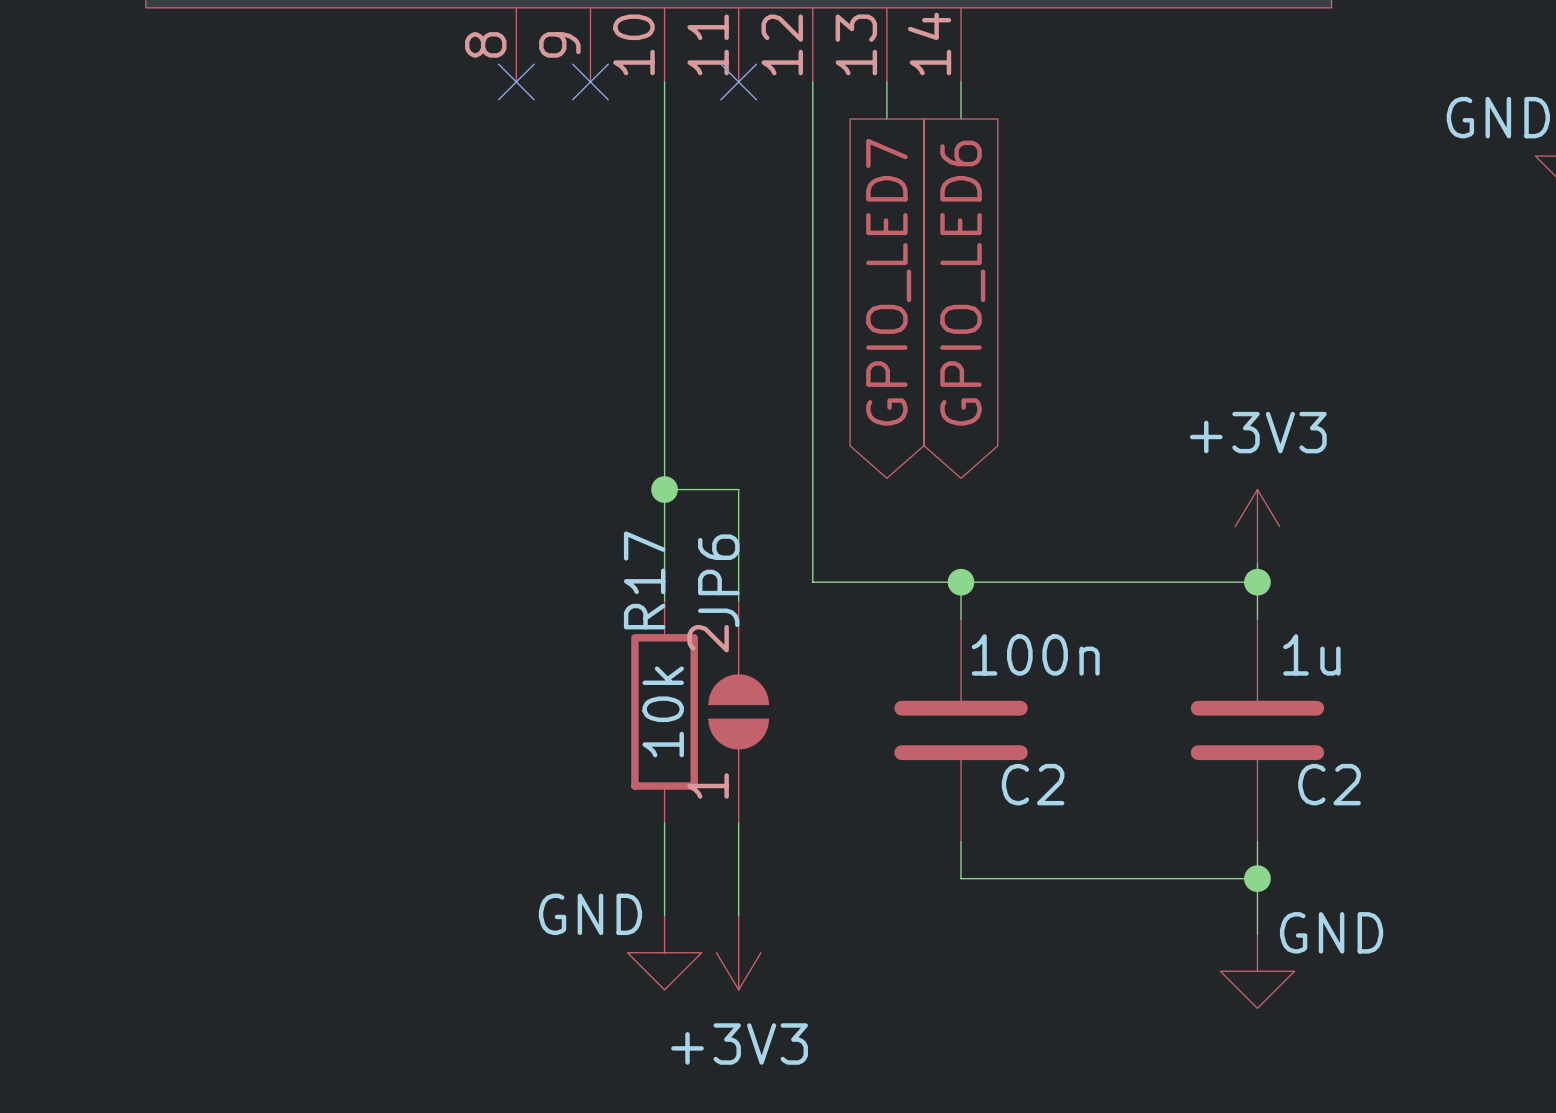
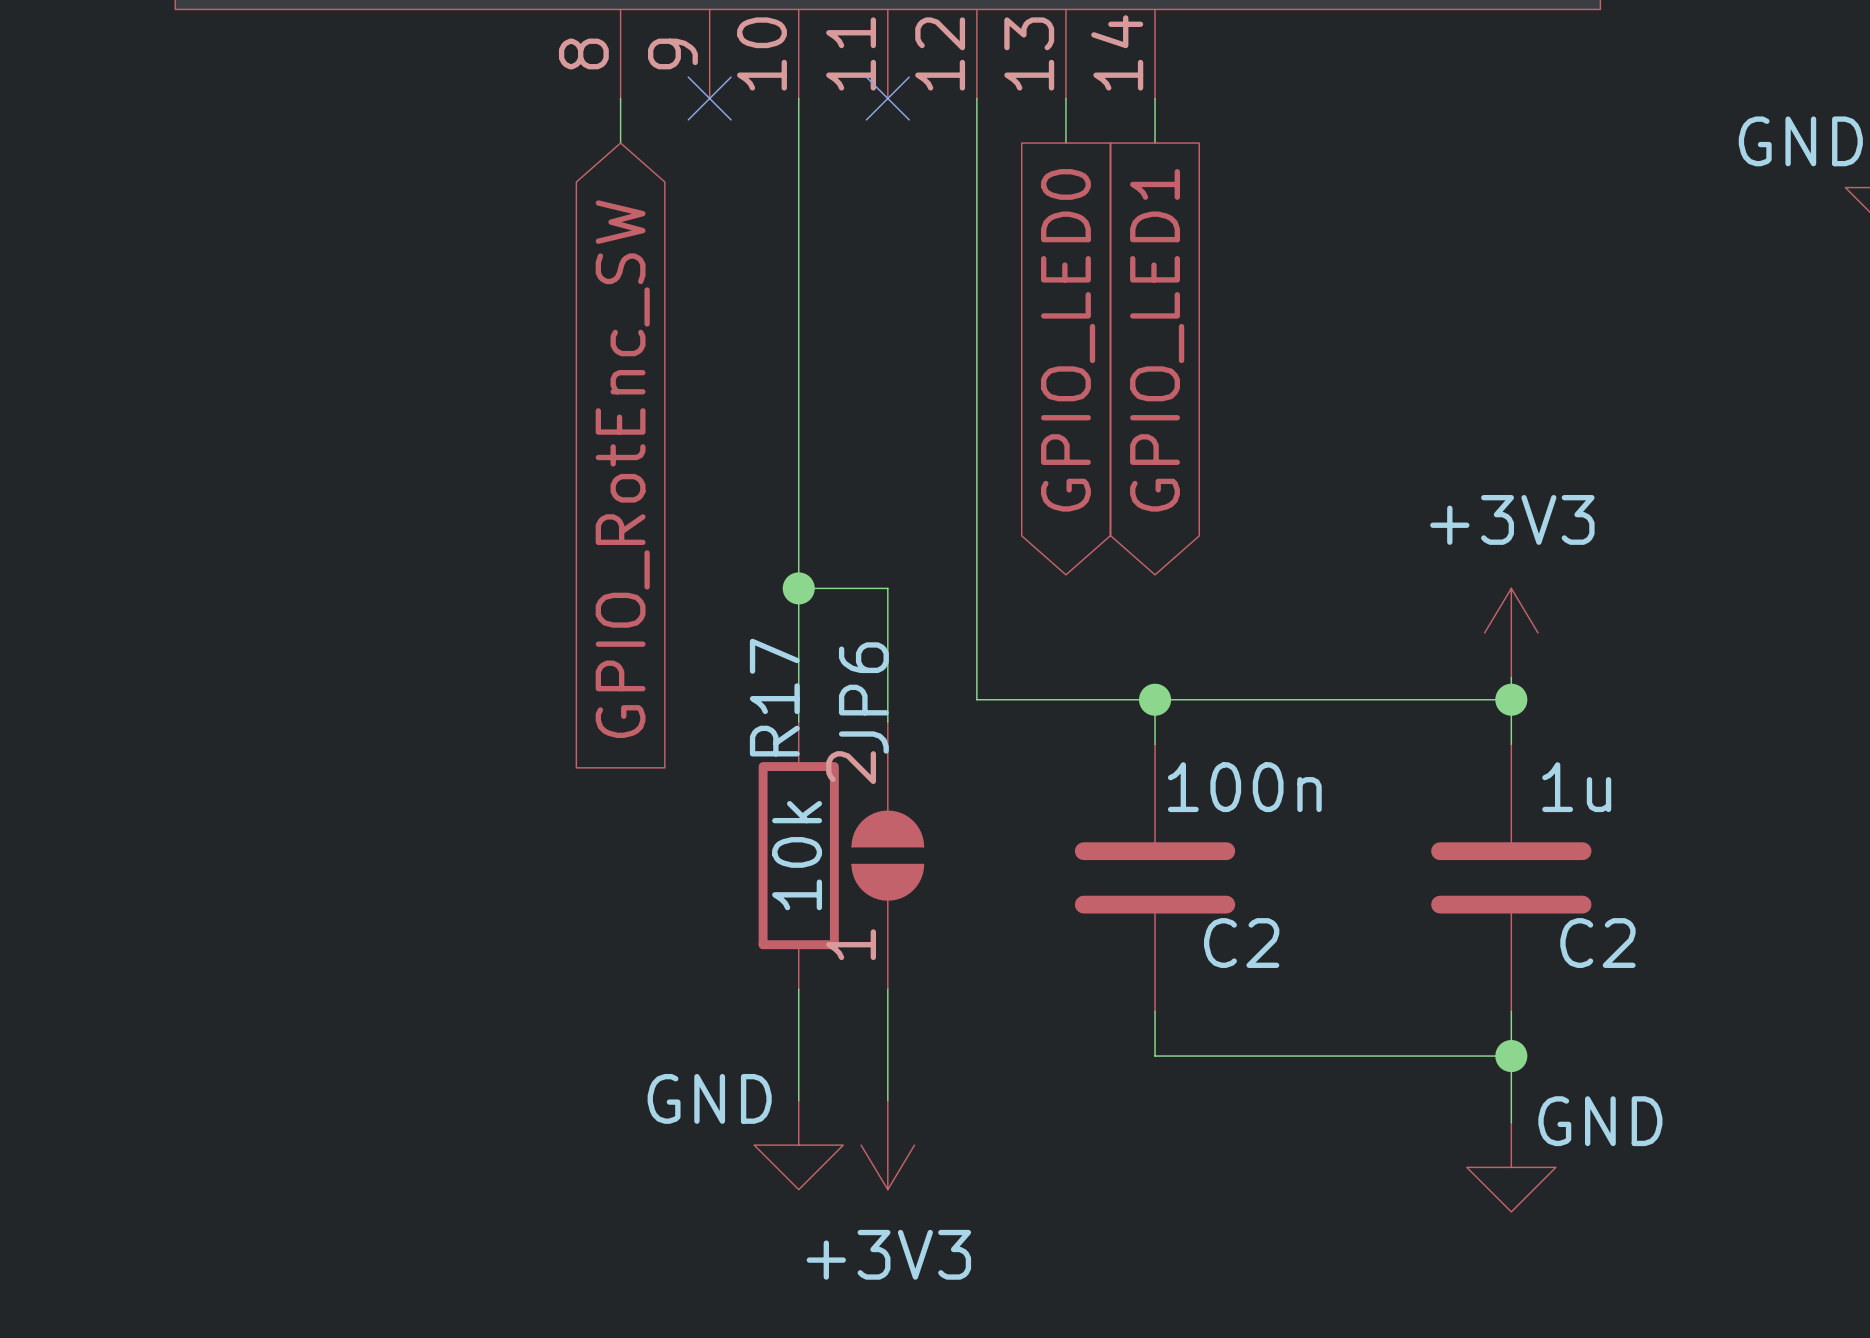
wire: none -> (620, 98) (620, 143)
no-connect mark: (516, 81) -> none
global label: GPIO_LED7 (888, 282) -> GPIO_LED0 (1068, 340)
global label: GPIO_LED6 (962, 283) -> GPIO_LED1 (1157, 340)
global label: none -> GPIO_RotEnc_SW (622, 469)

